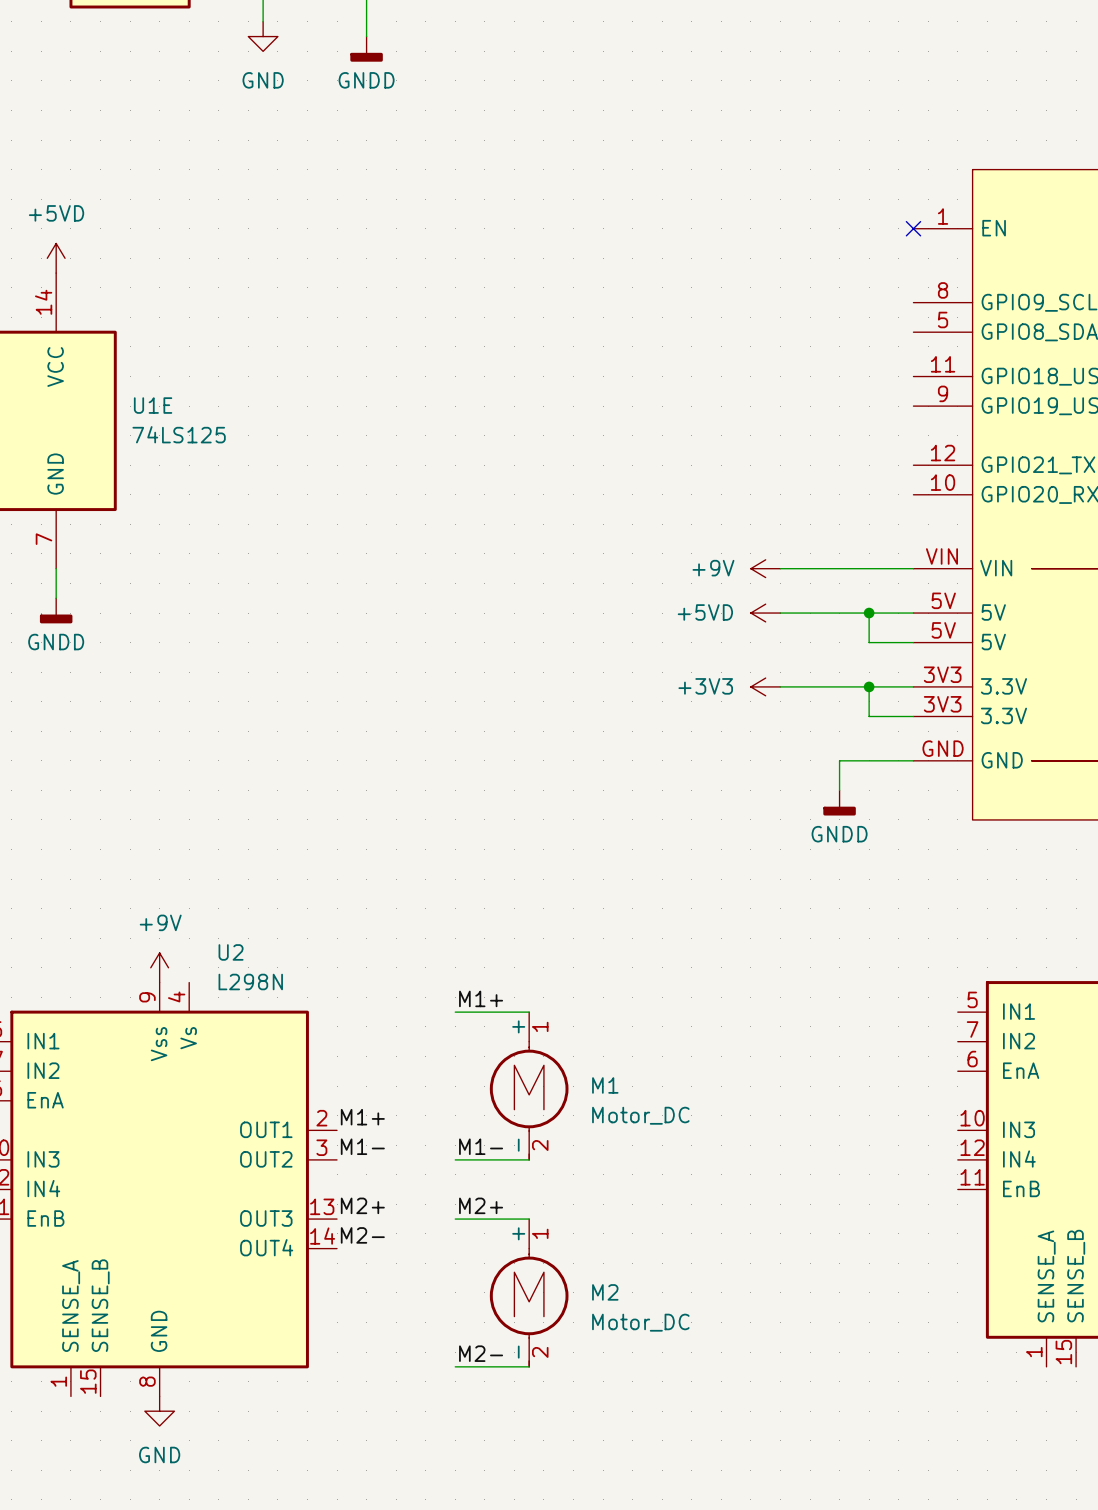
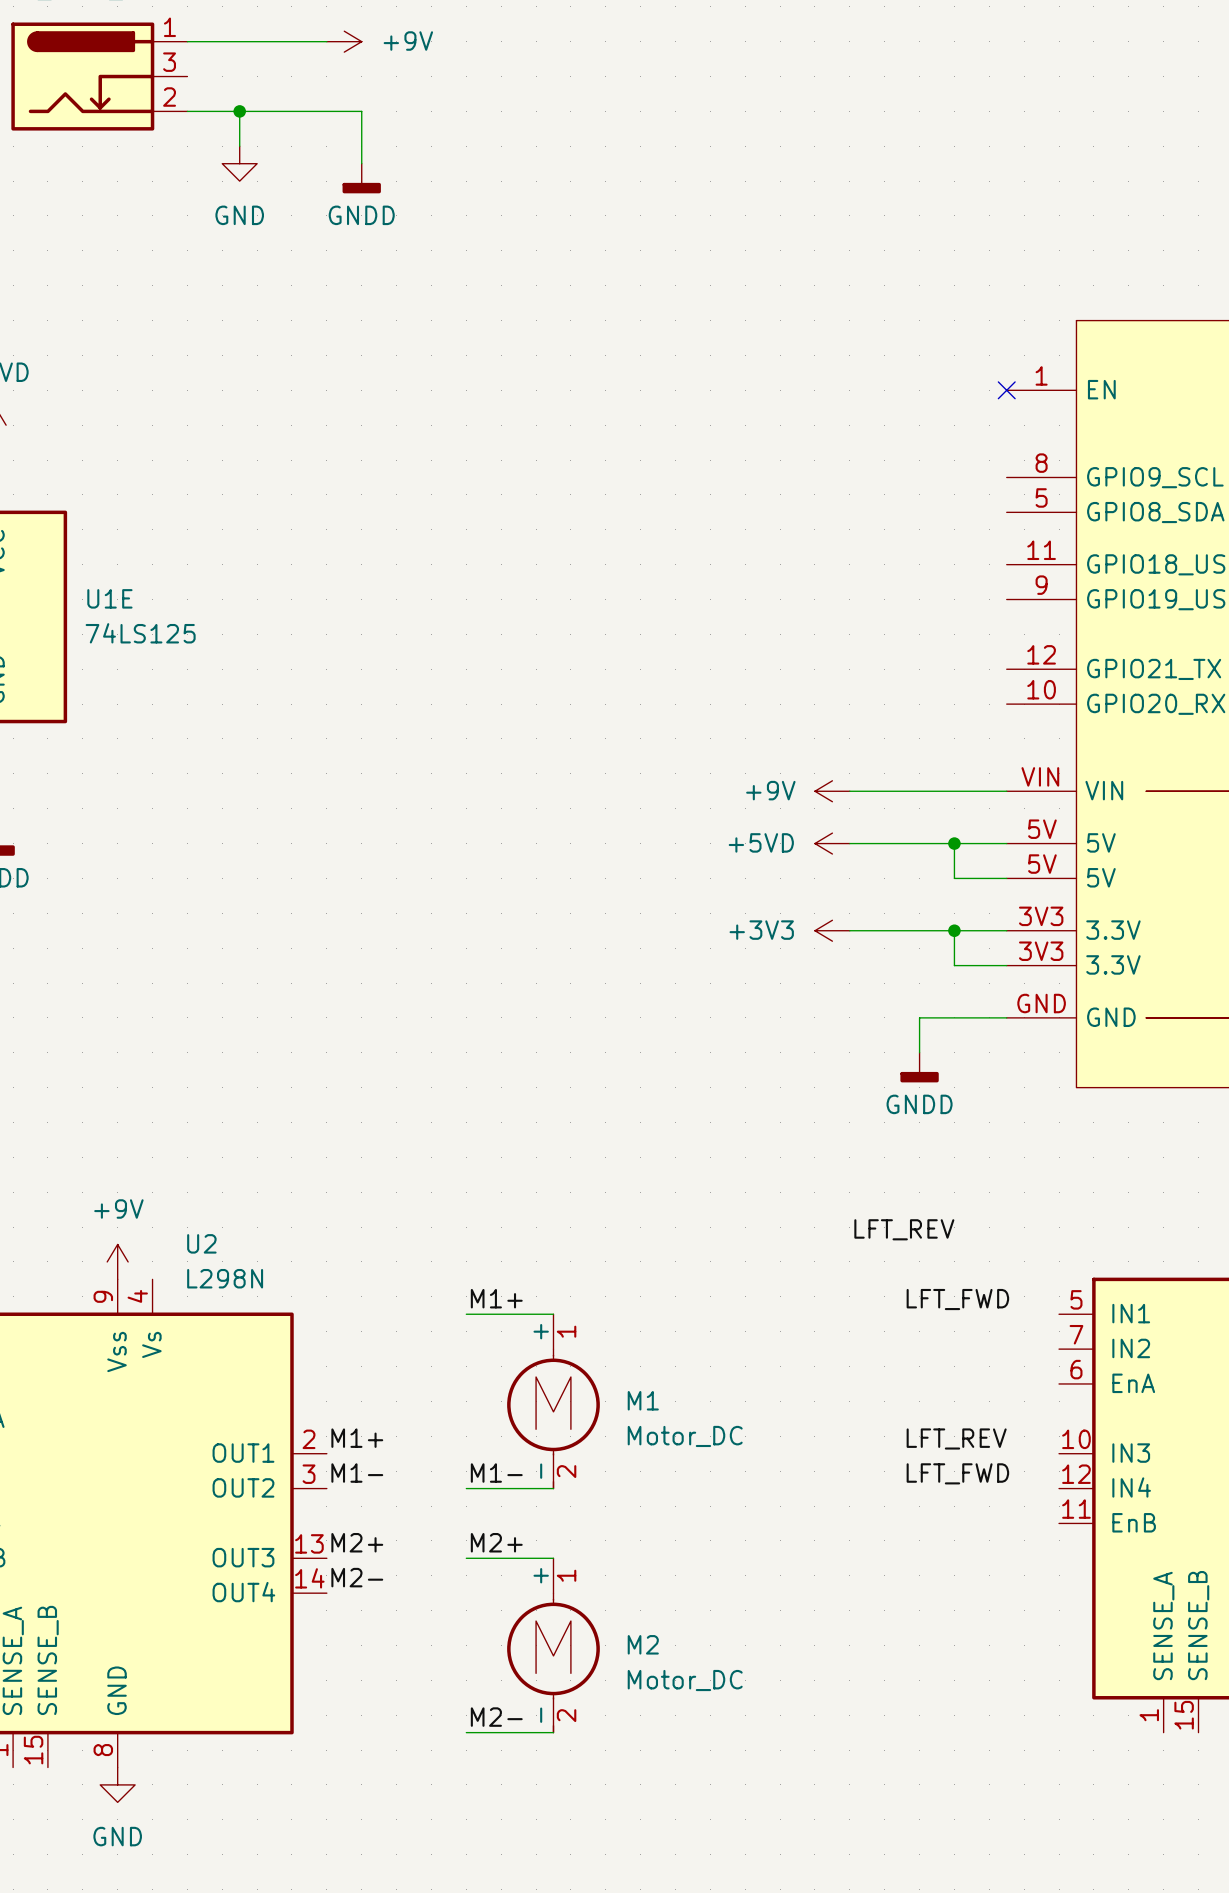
label: none -> LFT_REV (904, 1229)
label: none -> LFT_FWD (957, 1299)
label: none -> LFT_REV (956, 1438)
label: none -> LFT_FWD (957, 1473)

